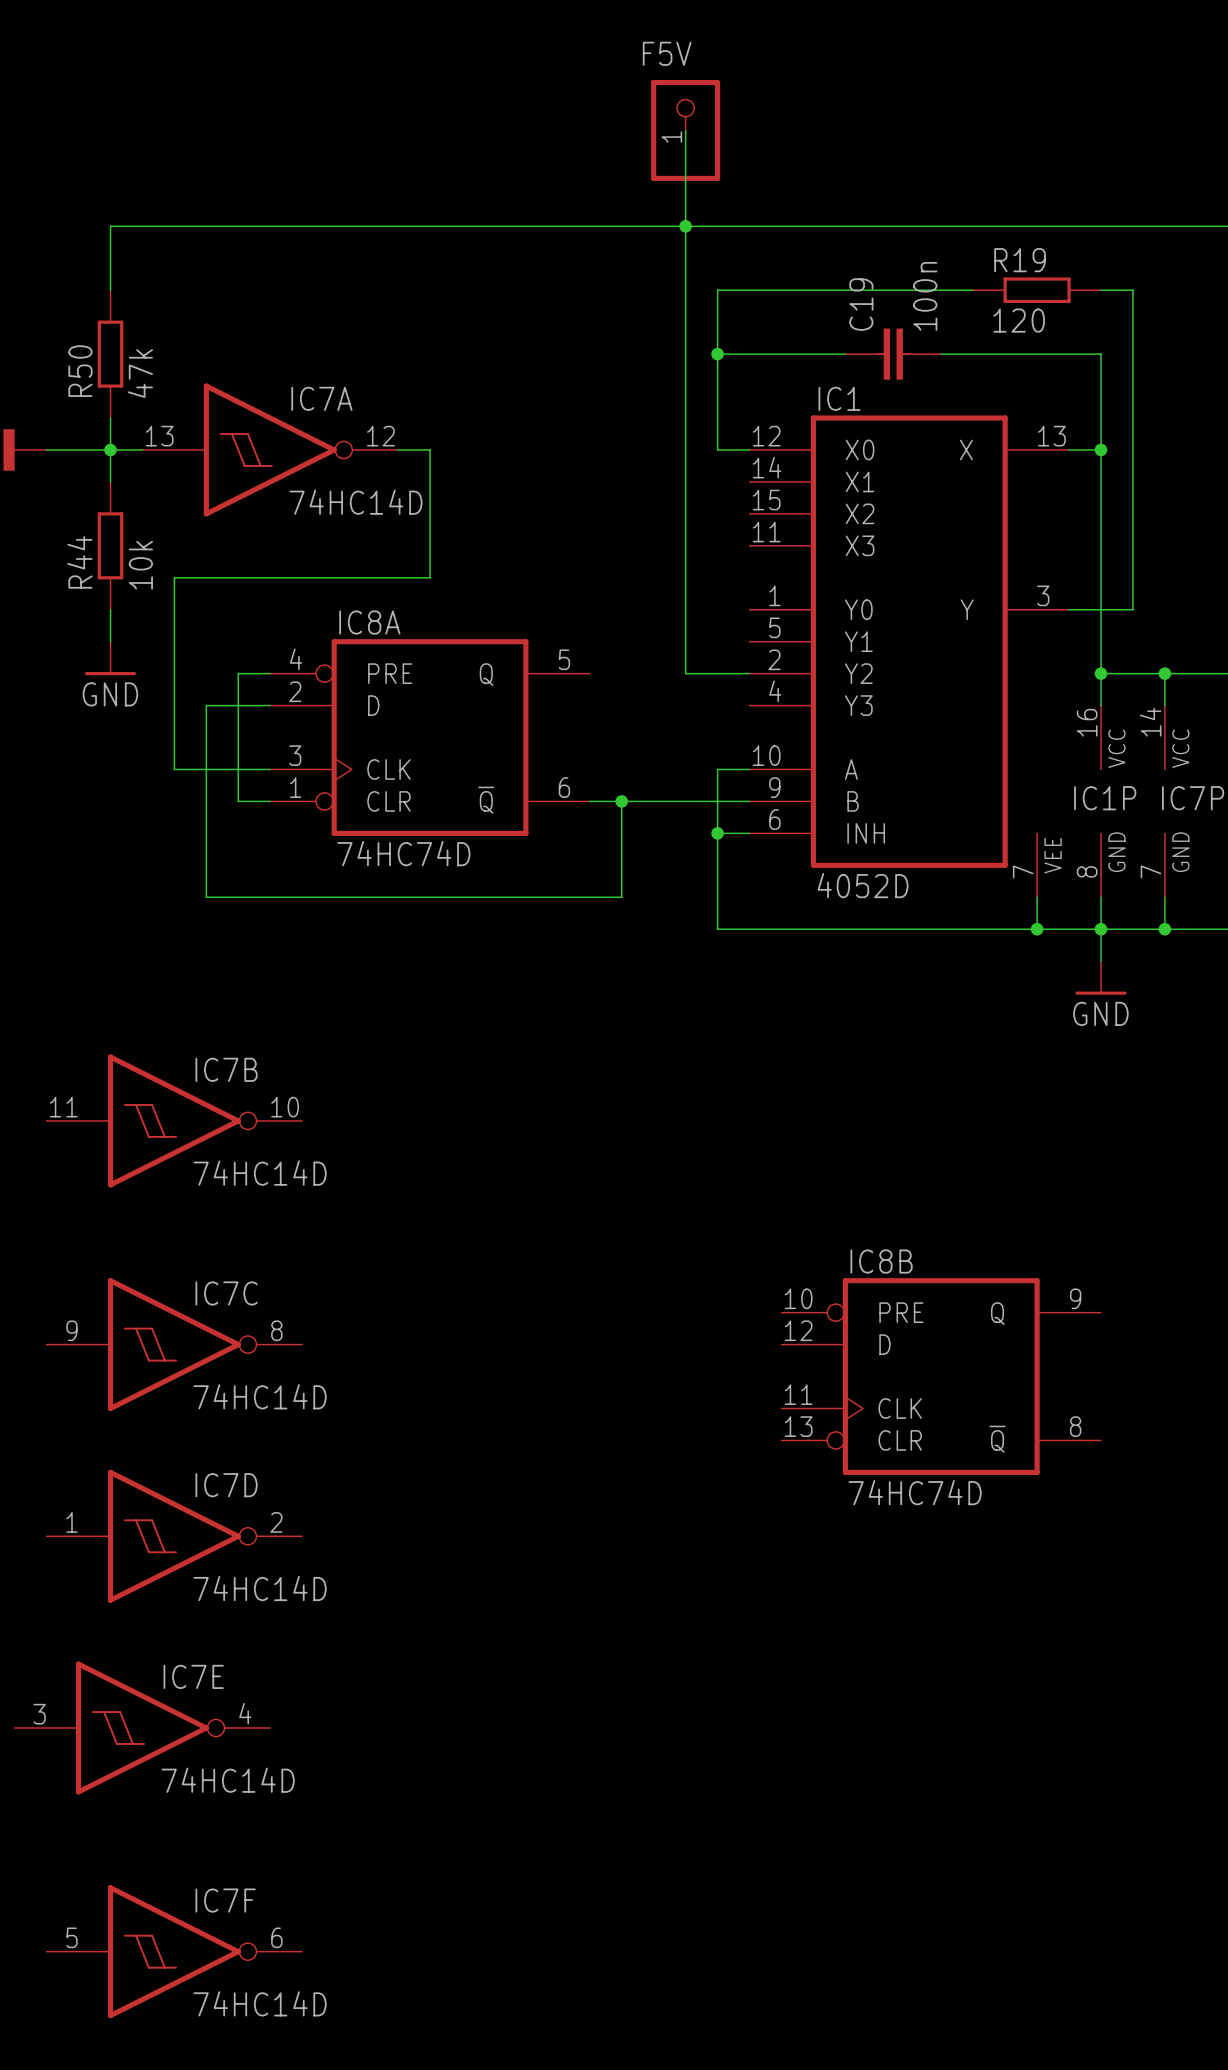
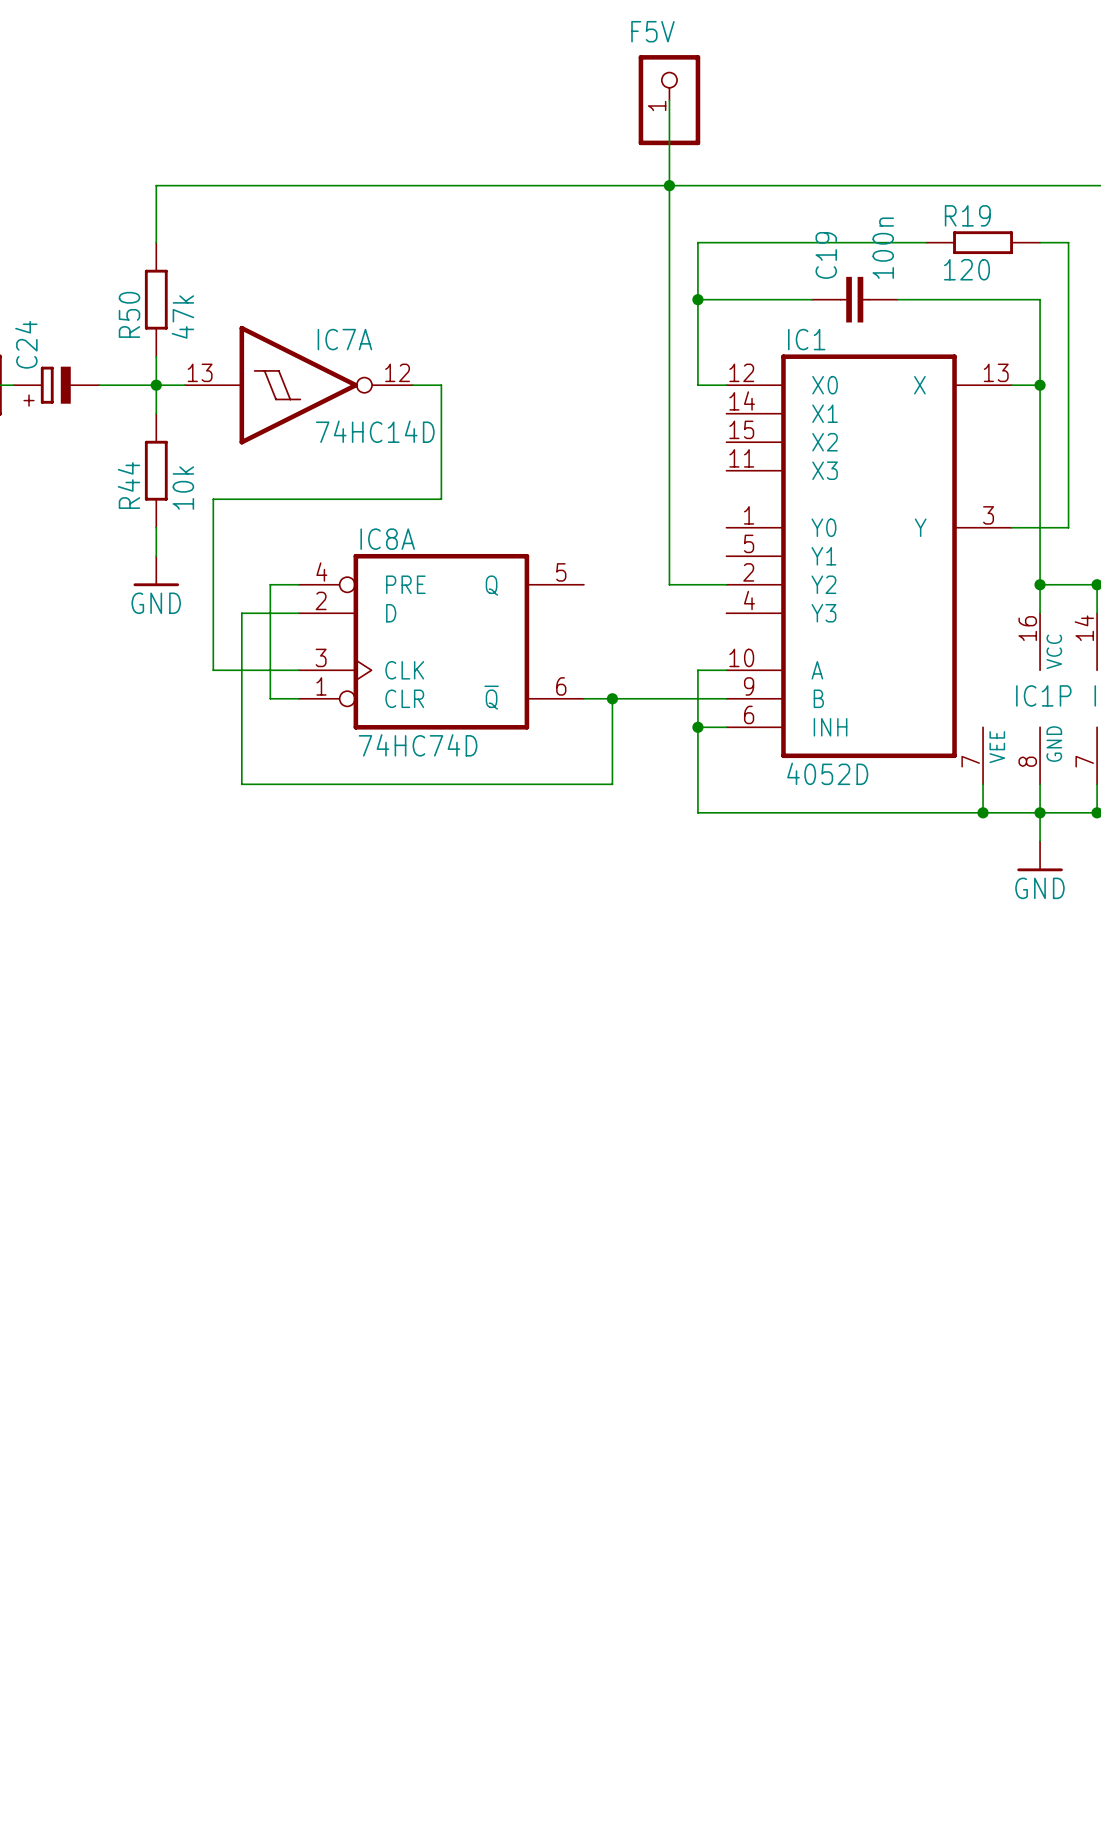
IC7B: 74HC14D (174, 1120) -> none
IC7C: 74HC14D (174, 1344) -> none
IC8B: 74HC74D (941, 1376) -> none
IC7D: 74HC14D (174, 1536) -> none
IC7E: 74HC14D (142, 1728) -> none
IC7F: 74HC14D (174, 1951) -> none

